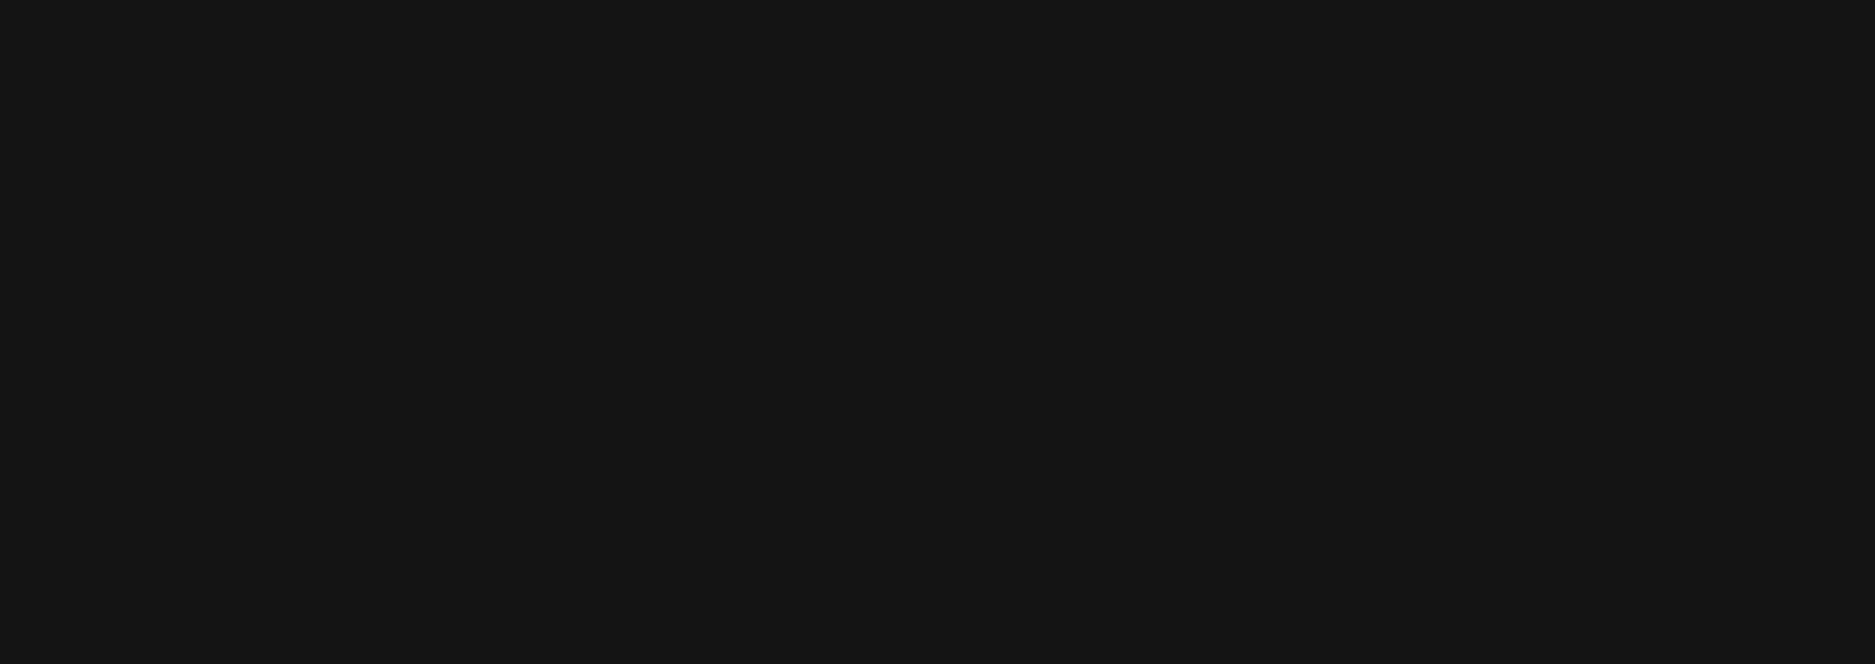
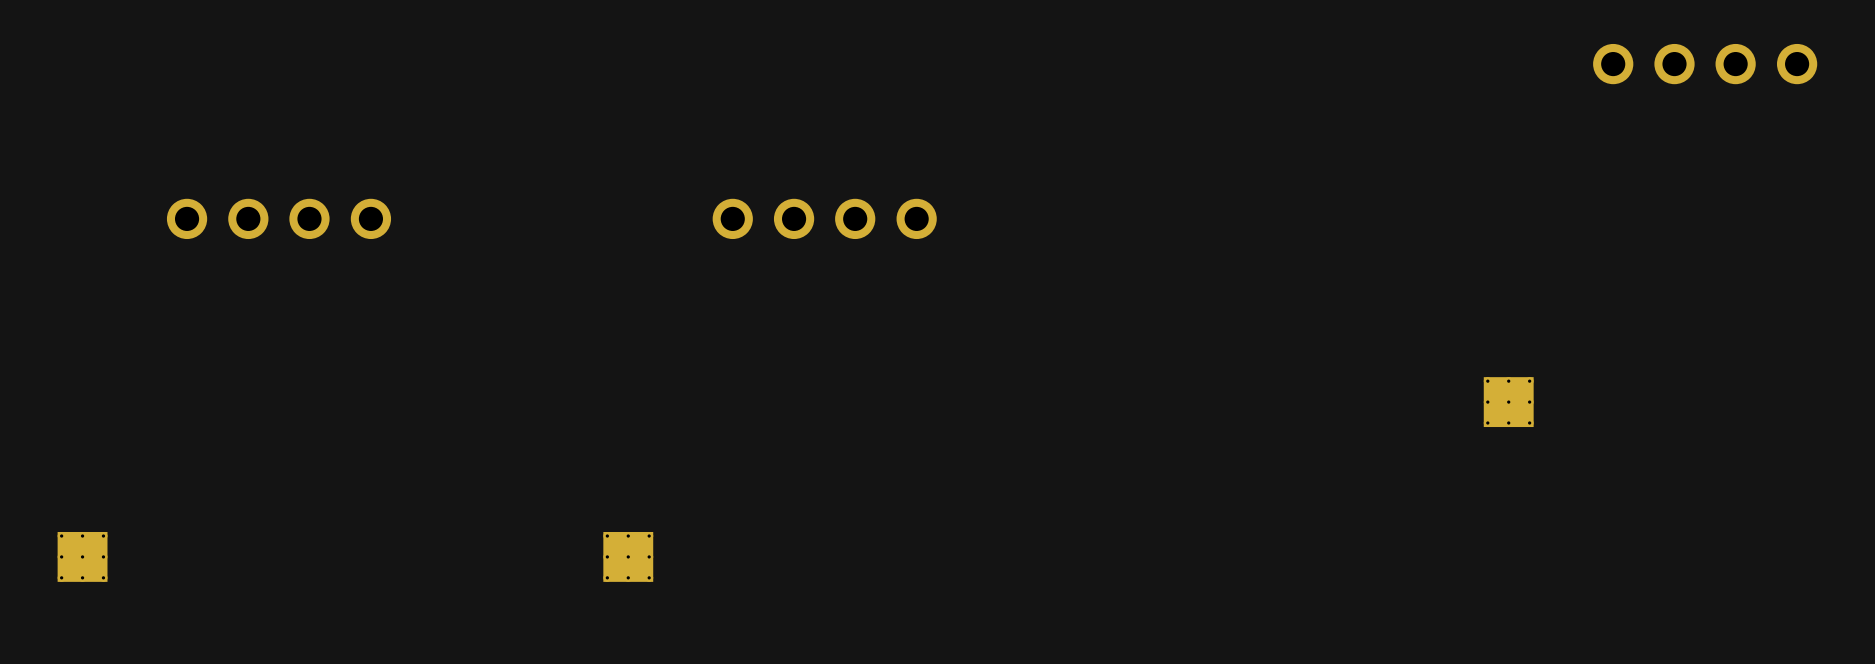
part: none -> (1705, 64)
part: none -> (278, 218)
part: none -> (824, 218)
part: none -> (1508, 402)
part: none -> (82, 556)
part: none -> (628, 556)

